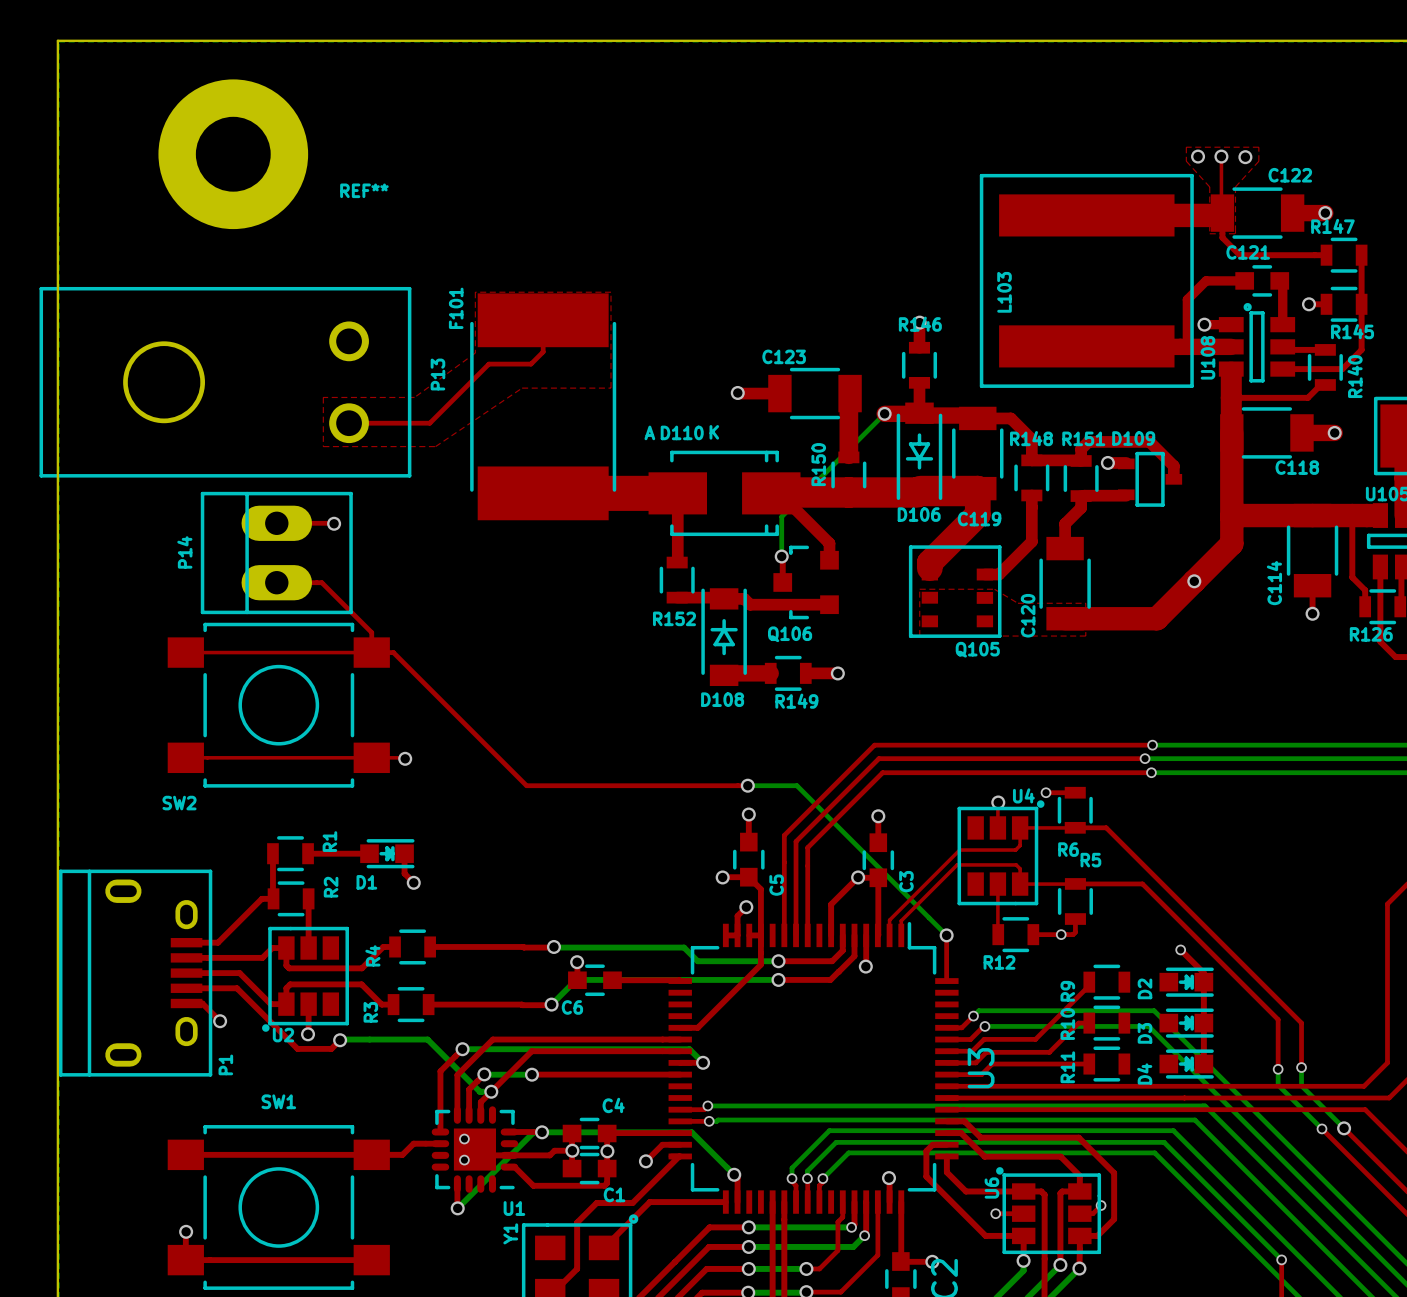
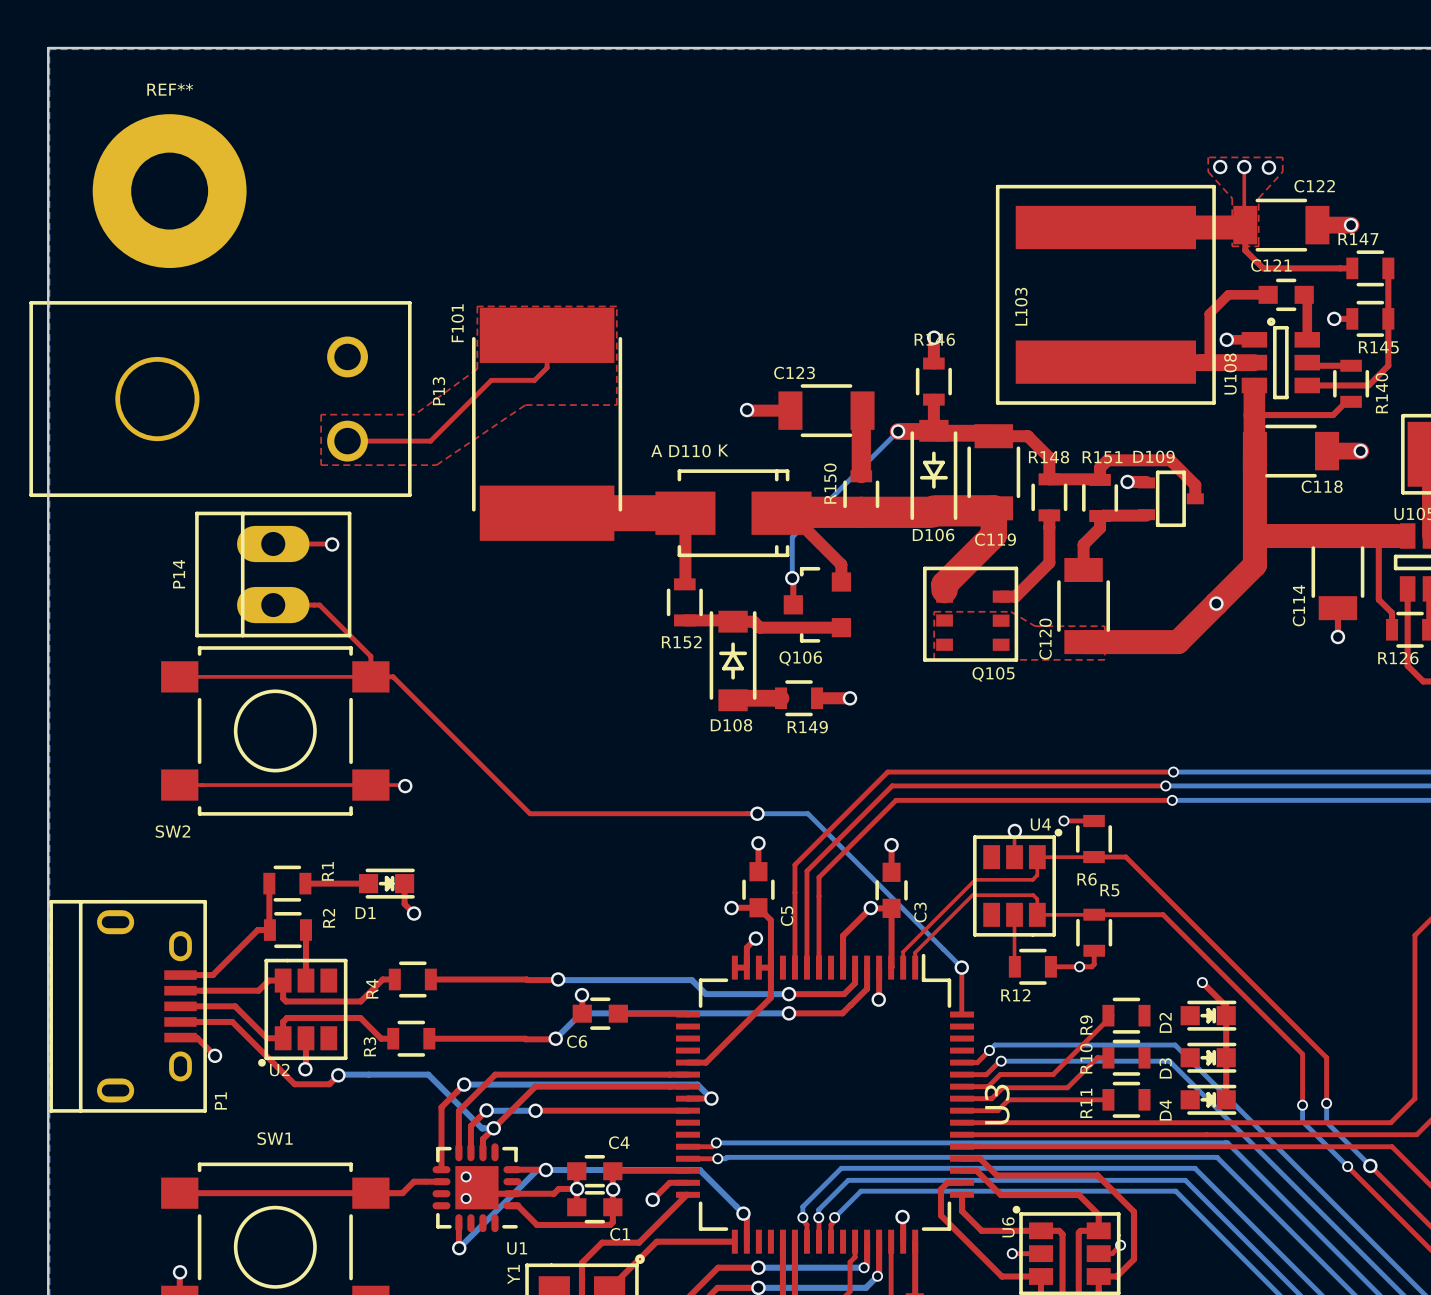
REF** position: (233, 154) -> (169, 191)
REF** name position: REF** (364, 190) -> REF** (170, 89)

